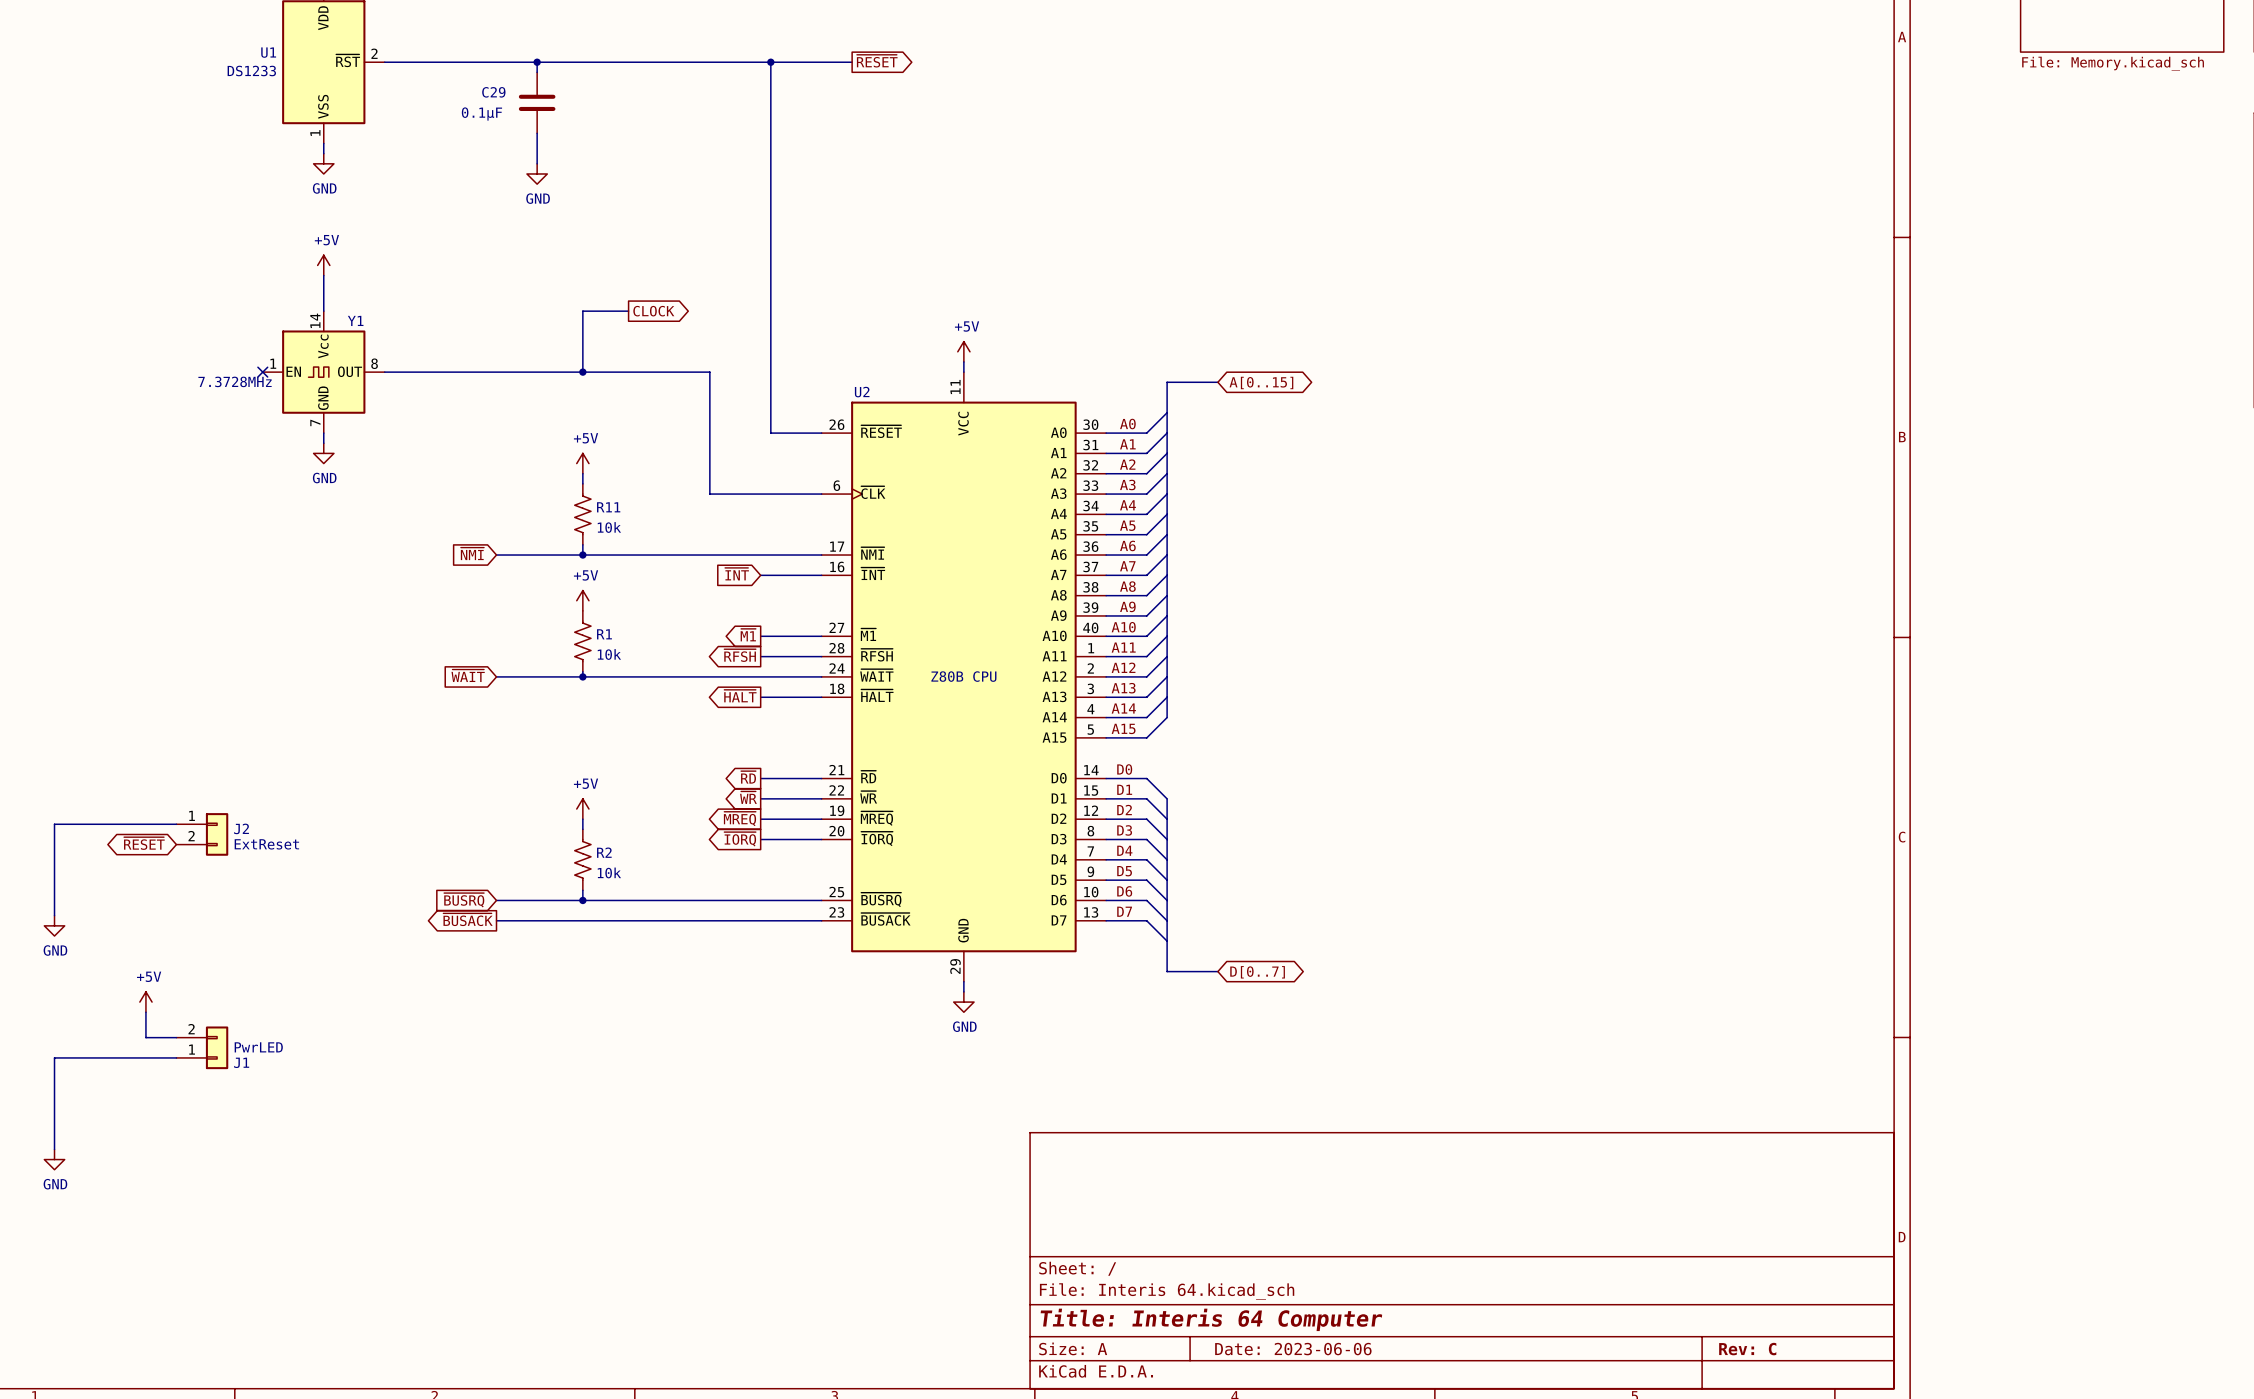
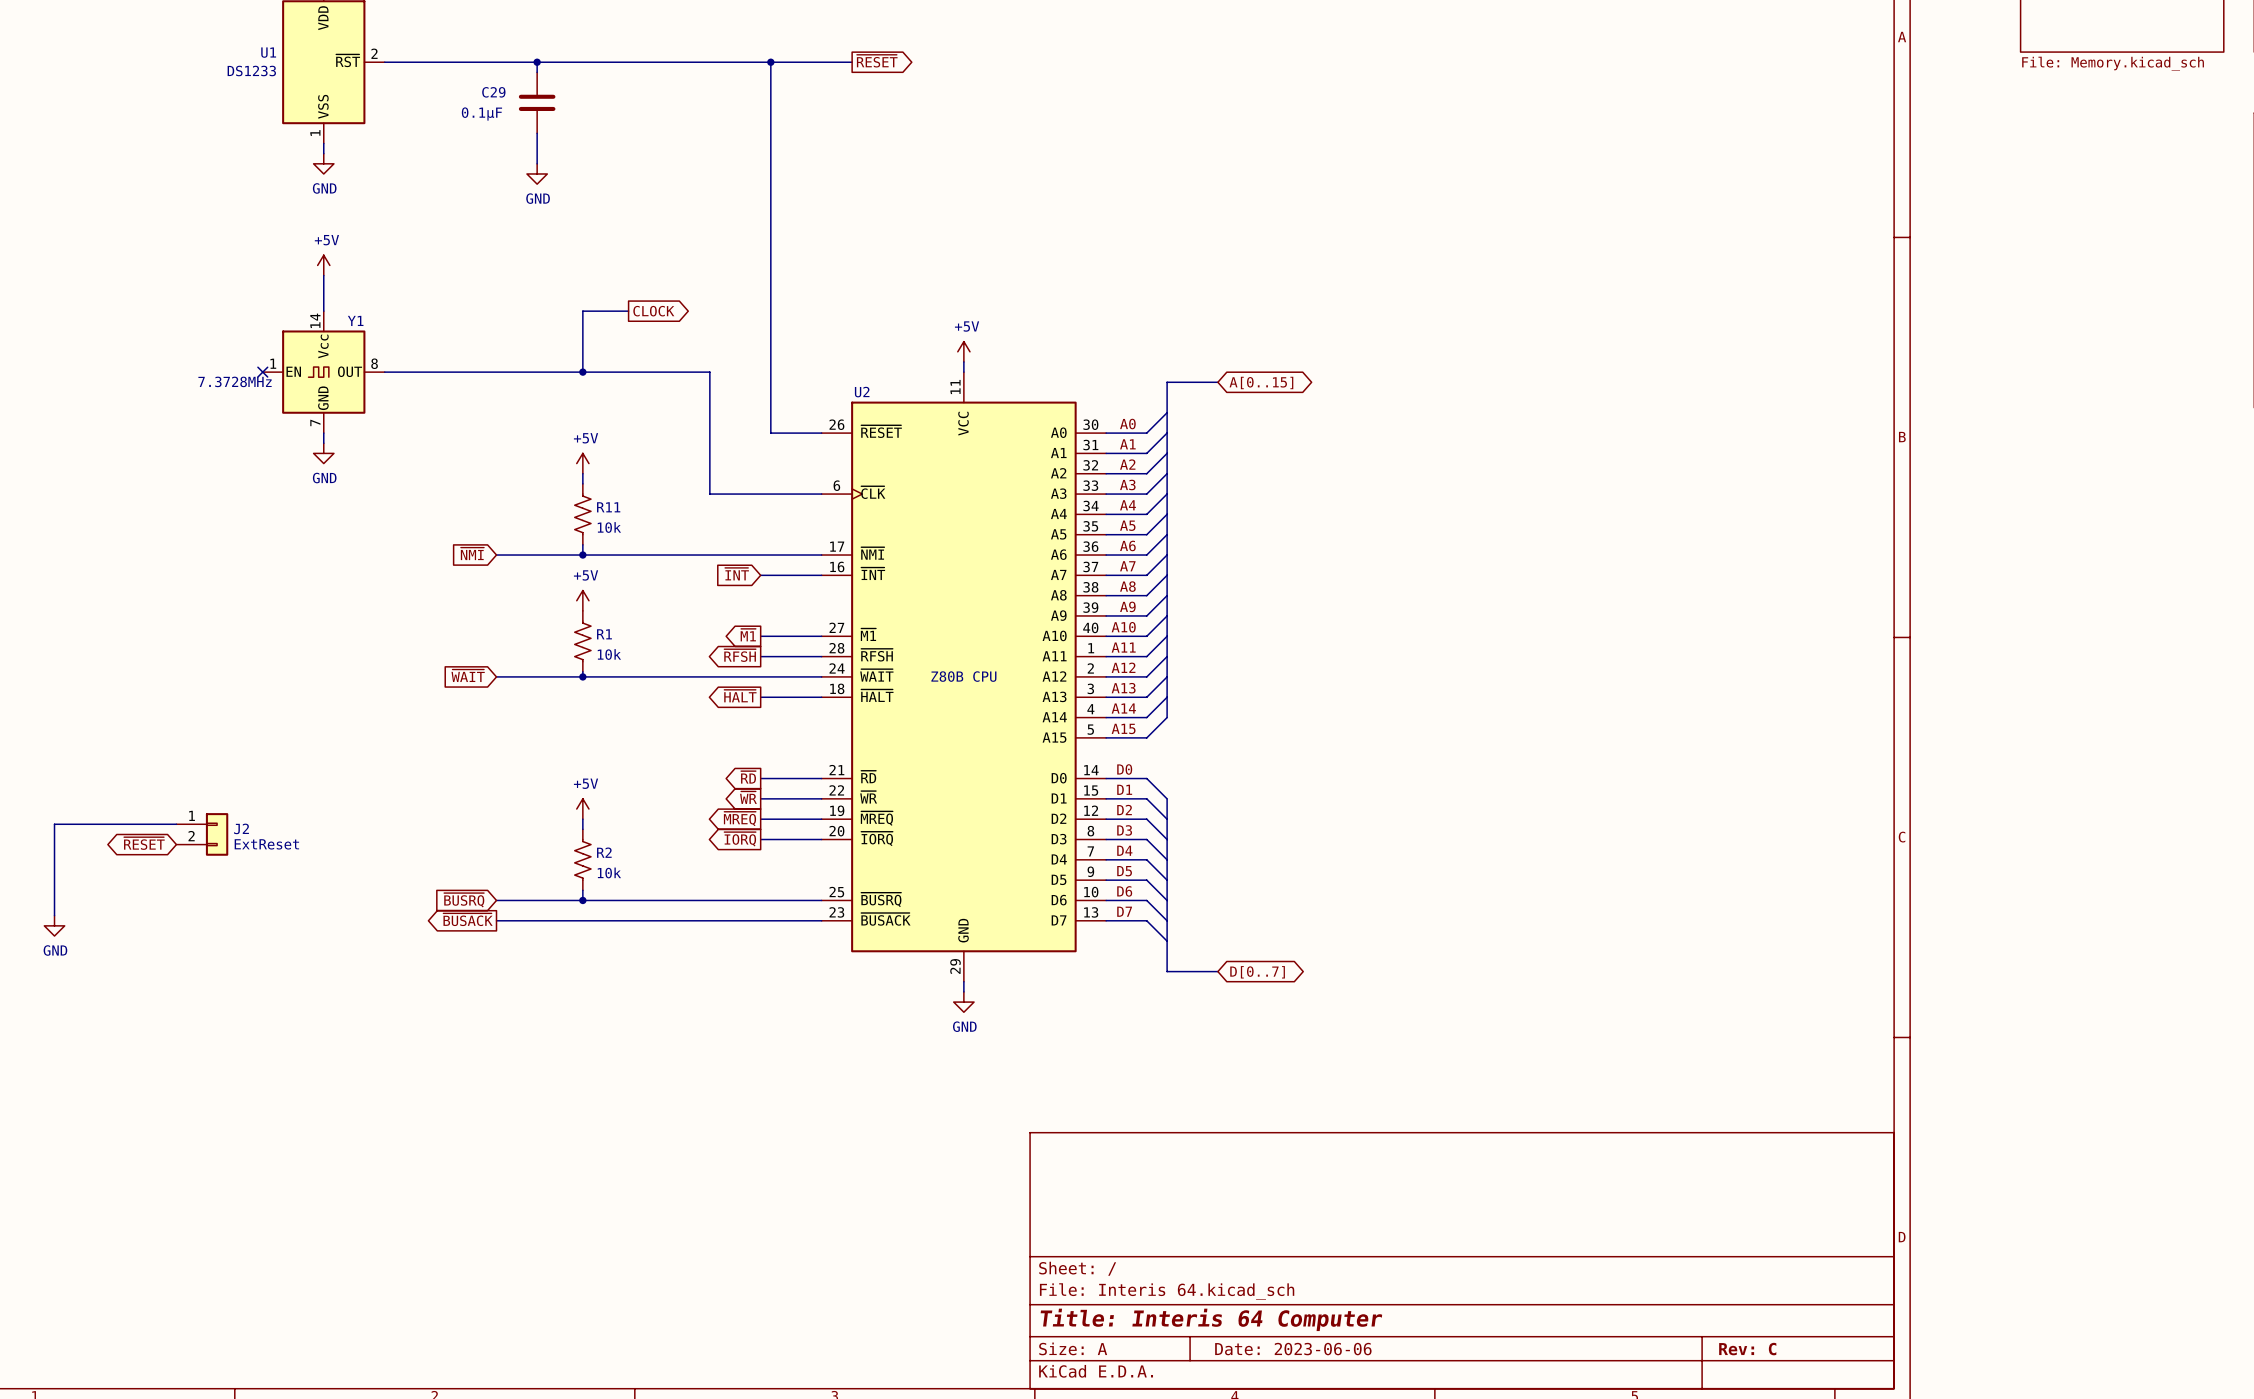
power symbol: +5V (145, 1002) -> none
wire: (145, 1012) (145, 1037) (176, 1037) -> none
J1: PwrLED (202, 1047) -> none
wire: (176, 1057) (54, 1057) (54, 1149) -> none
power symbol: GND (54, 1159) -> none

